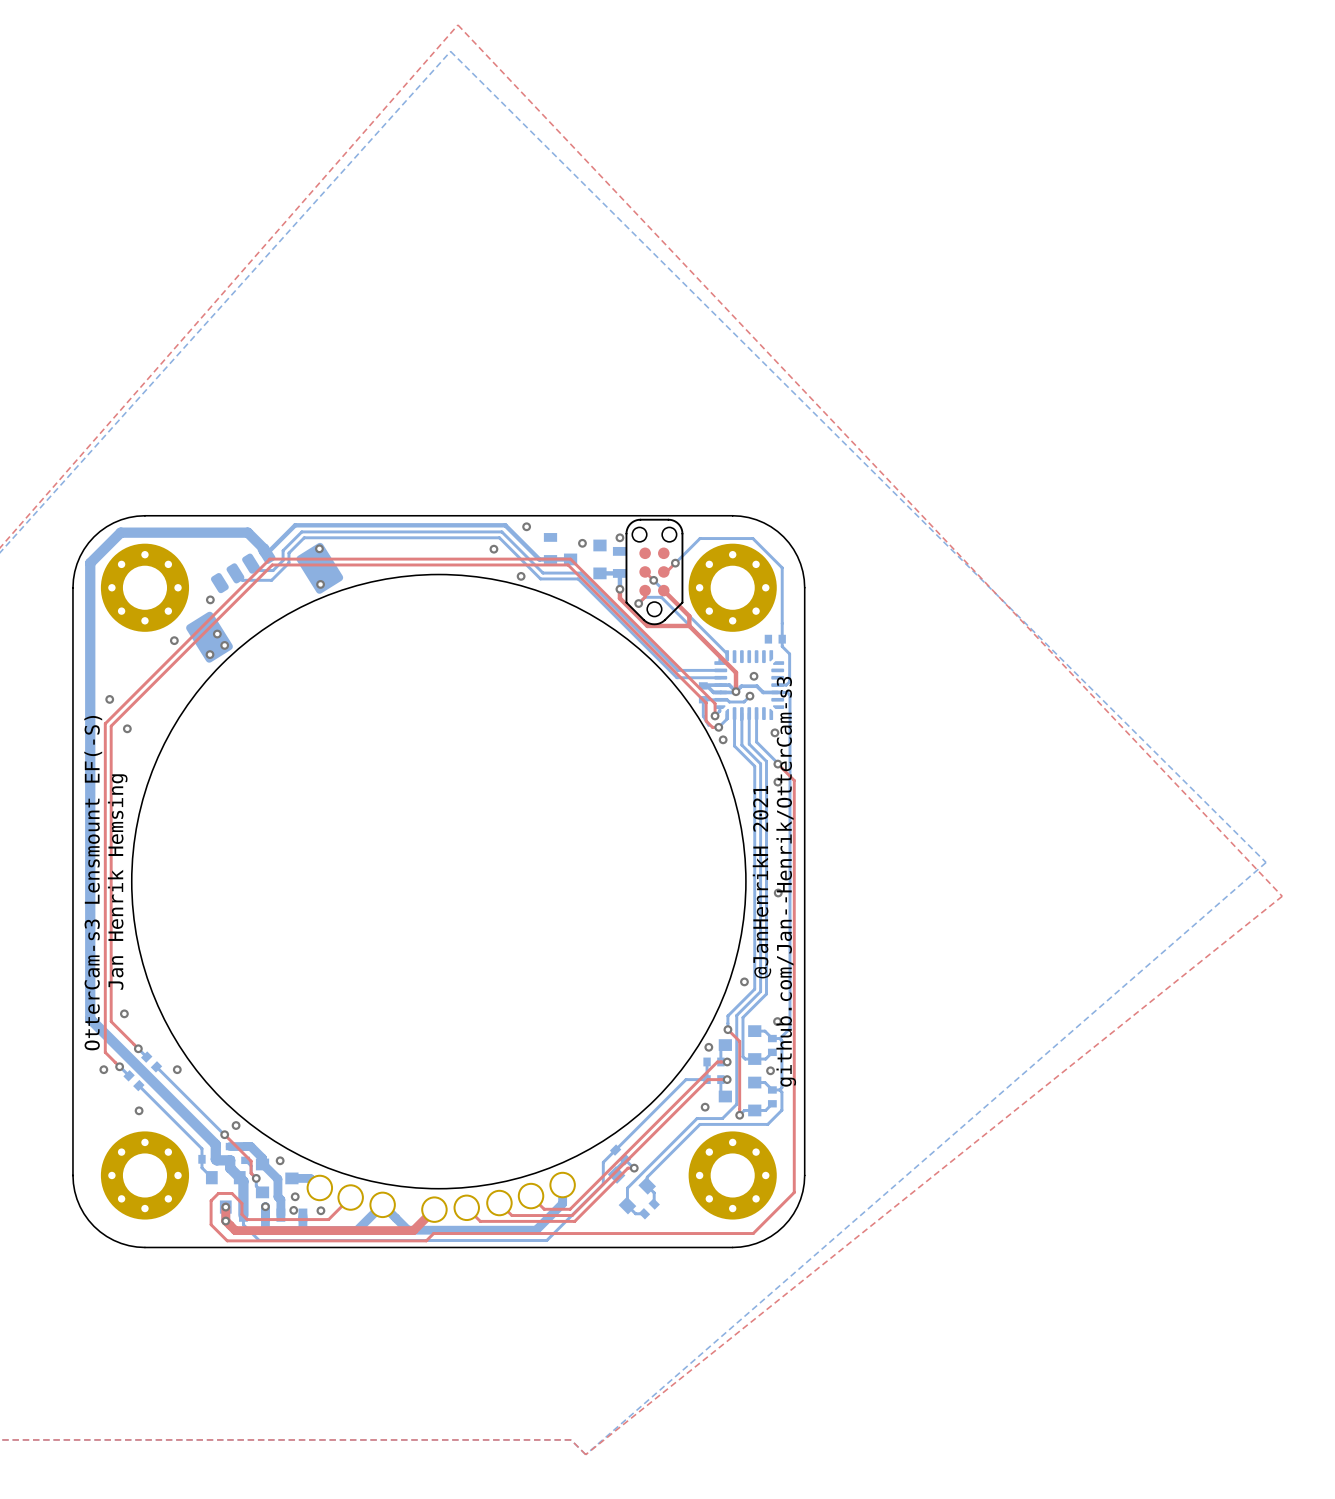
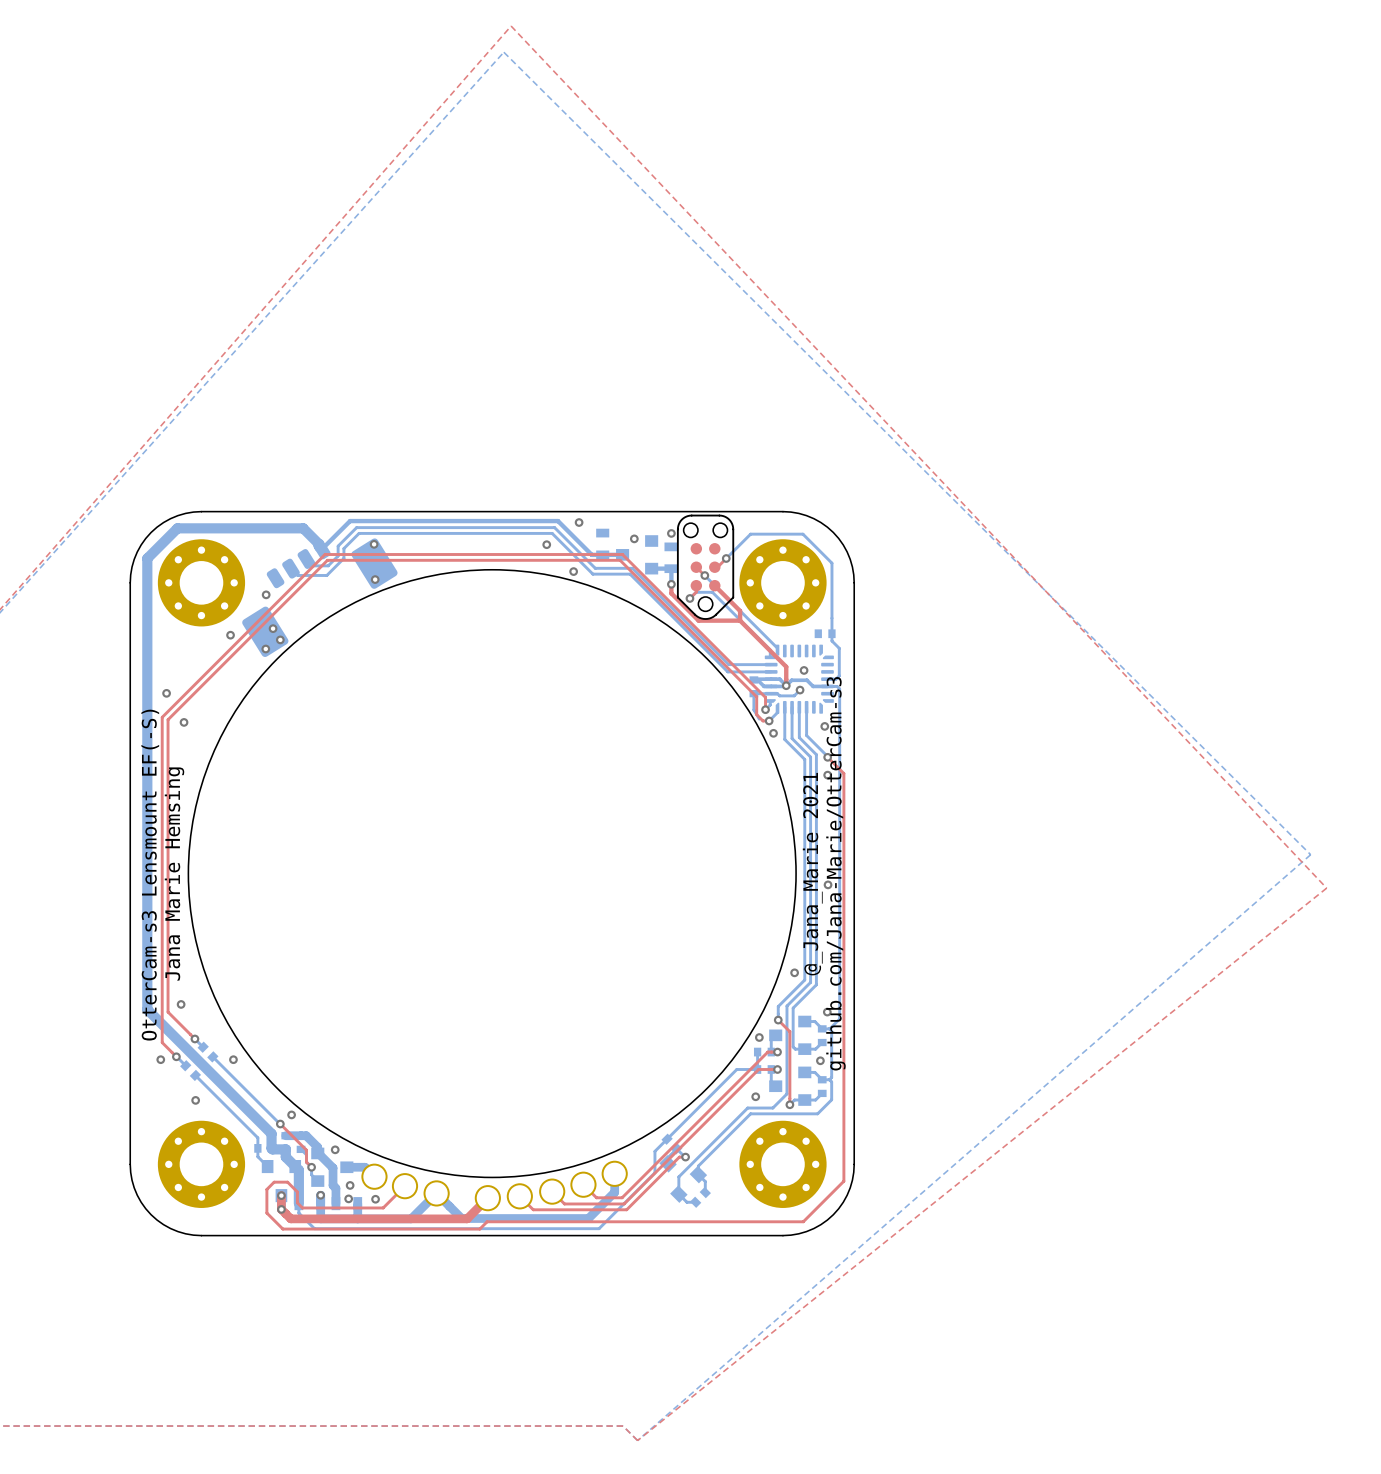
text: github.com/Jan--Henrik/OtterCam-s3 (786, 881) -> github.com/Jana-Marie/OtterCam-s3 (835, 873)
text: Jan Henrik Hemsing (117, 882) -> Jana Marie Hemsing (174, 874)
text: @JanHenrikH 2021 (761, 882) -> @_Jana_Marie 2021 (812, 874)

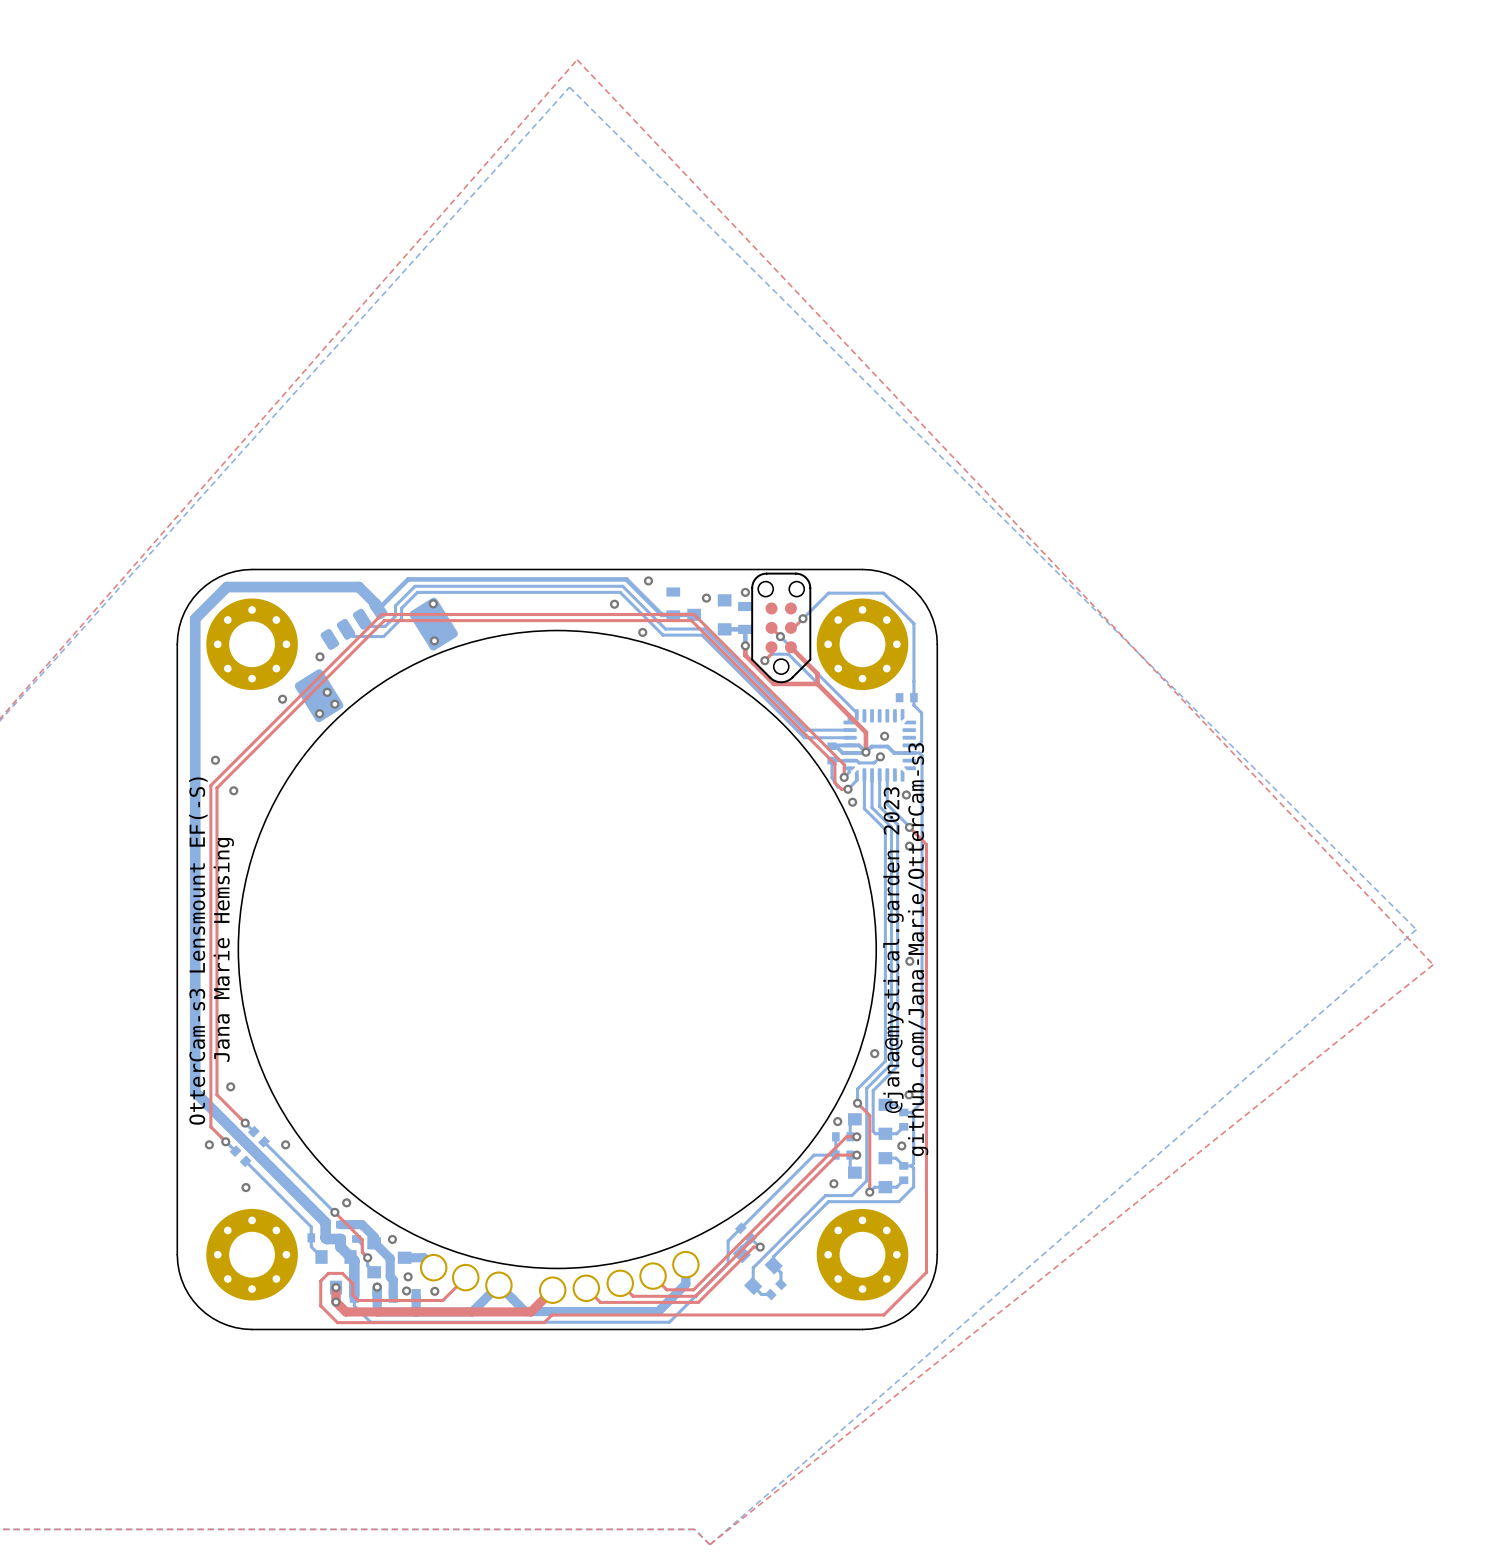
text: @_Jana_Marie 2021 (812, 874) -> @jana@mystical.garden 2023 (893, 950)

